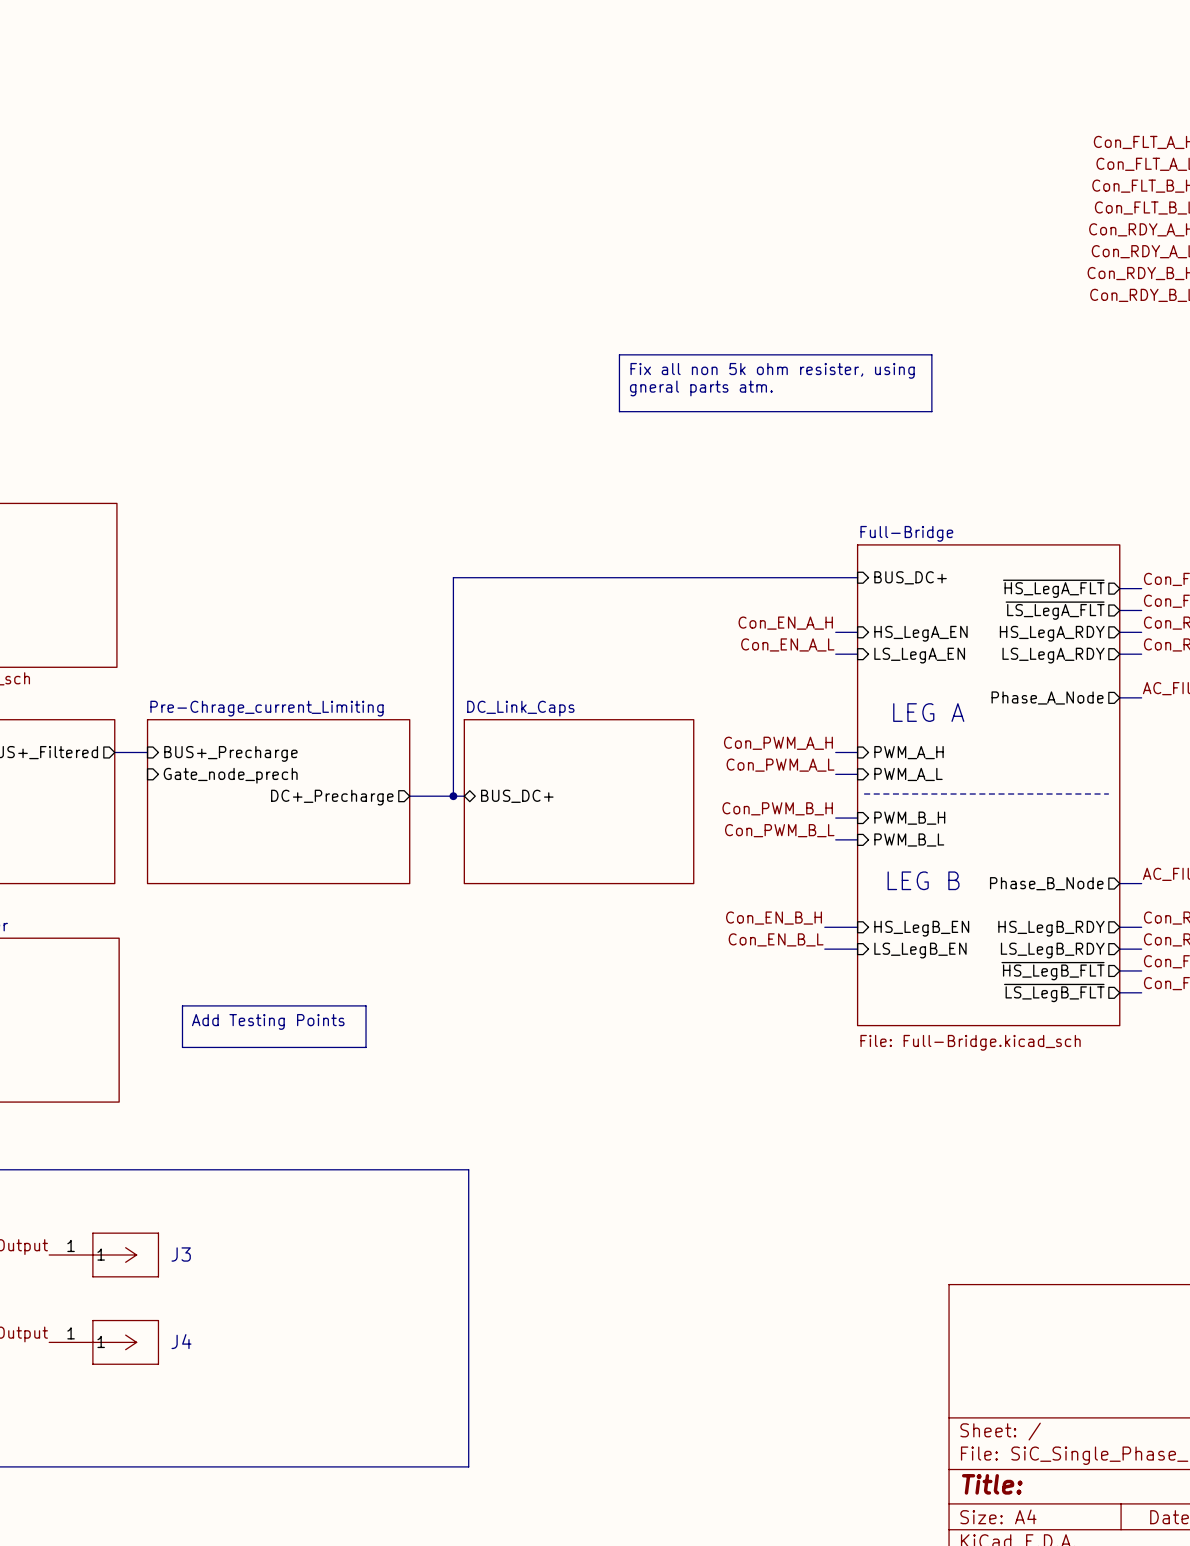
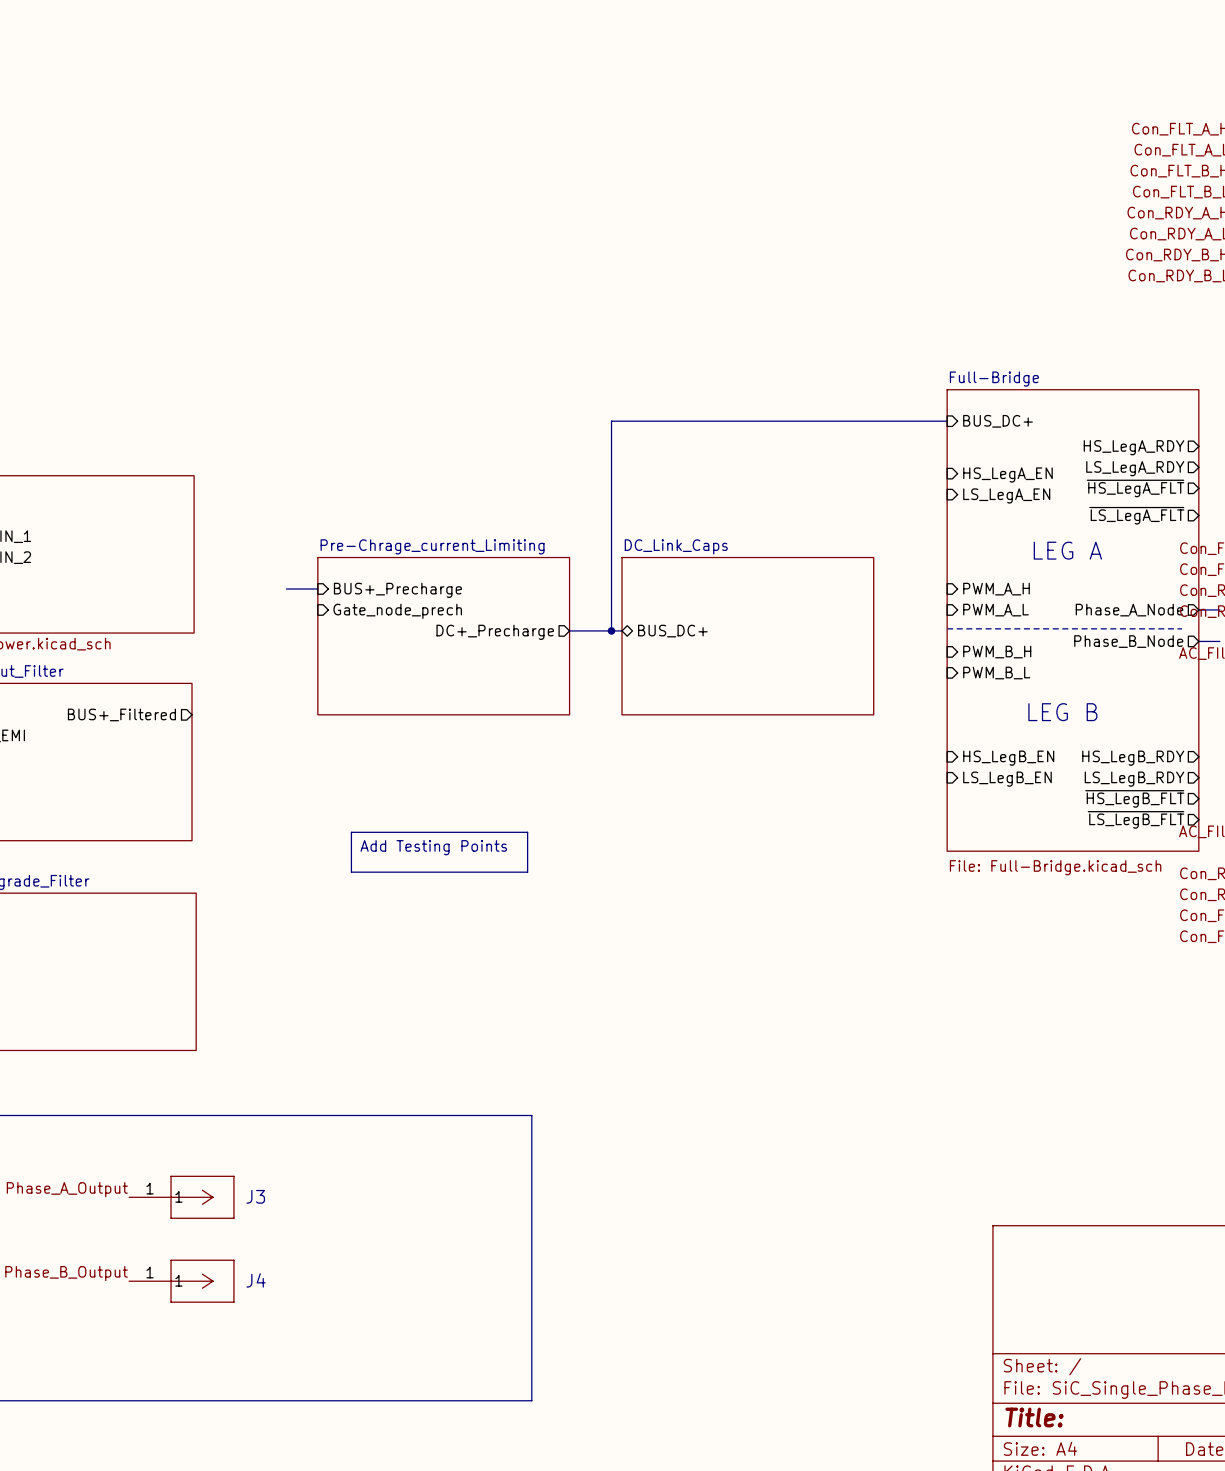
line: (619, 354) (931, 354) (931, 411) (619, 411) (619, 354) -> none
text: Fix all non 5k ohm resister, using (772, 370) -> none
text: gneral parts atm. (701, 388) -> none
wire: none -> (947, 421) (611, 421) (611, 630)
wire: (857, 577) (453, 577) (453, 796) -> none
sheet pin position: BUS_DC+ (910, 577) -> BUS_DC+ (997, 421)
sheet pin position: ~{HS_LegA_FLT} (1053, 588) -> ~{HS_LegA_FLT} (1135, 488)
wire: (1119, 588) (1141, 588) -> none
sheet pin position: ~{LS_LegA_FLT} (1055, 610) -> ~{LS_LegA_FLT} (1136, 515)
wire: (1119, 610) (1141, 610) -> none
label: Con_EN_A_H (785, 623) -> none
wire: (835, 632) (857, 632) -> none
wire: (1119, 632) (1141, 632) -> (1198, 609) (1219, 609)
sheet pin position: HS_LegA_EN (920, 633) -> HS_LegA_EN (1007, 474)
sheet pin position: HS_LegA_RDY (1052, 633) -> HS_LegA_RDY (1134, 447)
label: Con_EN_A_L (787, 644) -> none
wire: (835, 654) (857, 654) -> none
wire: (1119, 654) (1141, 654) -> (1198, 641) (1219, 641)
sheet pin position: LS_LegA_EN (919, 655) -> LS_LegA_EN (1006, 495)
sheet pin position: LS_LegA_RDY (1053, 655) -> LS_LegA_RDY (1135, 468)
junction: none -> (611, 630)
sheet pin: none -> BUS_DC+ (672, 631)
sheet DC_Link_Caps: none -> (747, 636)
sheet pin position: Phase_A_Node (1047, 697) -> Phase_A_Node (1129, 610)
wire: (1119, 697) (1141, 697) -> none
text position: LEG A (928, 712) -> LEG A (1067, 550)
label: Con_PWM_A_H (778, 743) -> none
wire: (114, 752) (147, 752) -> (286, 588) (317, 588)
wire: (835, 752) (857, 752) -> none
sheet pin position: PWM_A_H (909, 752) -> PWM_A_H (996, 589)
sheet pin position: BUS+_Precharge (230, 753) -> BUS+_Precharge (397, 590)
label: Con_PWM_A_L (780, 765) -> none
wire: (835, 774) (857, 774) -> none
sheet pin position: PWM_A_L (908, 774) -> PWM_A_L (995, 610)
sheet pin position: Gate_node_prech (230, 775) -> Gate_node_prech (397, 611)
sheet Full-Bridge position: (988, 785) -> (1072, 620)
line: (864, 794) (1108, 794) -> (947, 628) (1182, 628)
wire: (409, 796) (464, 796) -> (569, 630) (622, 630)
junction: (453, 796) -> none
sheet pin: BUS_DC+ (517, 796) -> none
sheet pin position: DC+_Precharge (332, 797) -> DC+_Precharge (495, 632)
sheet Pre-Chrage_current_Limiting position: (278, 801) -> (443, 636)
sheet DC_Link_Caps: (579, 801) -> none
label: Con_PWM_B_H (777, 808) -> none
wire: (835, 818) (857, 818) -> none
sheet pin position: PWM_B_H (909, 818) -> PWM_B_H (997, 652)
label: Con_PWM_B_L (779, 830) -> none
wire: (835, 839) (857, 839) -> none
sheet pin position: PWM_B_L (909, 839) -> PWM_B_L (996, 673)
text position: LEG B (923, 880) -> LEG B (1062, 712)
sheet pin position: Phase_B_Node (1046, 883) -> Phase_B_Node (1128, 641)
wire: (1119, 883) (1141, 883) -> none
label: Con_EN_B_H (774, 918) -> none
wire: (824, 927) (857, 927) -> none
wire: (1119, 927) (1141, 927) -> none
sheet pin position: HS_LegB_EN (921, 928) -> HS_LegB_EN (1008, 758)
sheet pin position: HS_LegB_RDY (1051, 928) -> HS_LegB_RDY (1133, 758)
label: Con_EN_B_L (776, 939) -> none
wire: (824, 949) (857, 949) -> none
wire: (1119, 949) (1141, 949) -> none
sheet pin position: LS_LegB_EN (920, 950) -> LS_LegB_EN (1007, 779)
sheet pin position: LS_LegB_RDY (1052, 950) -> LS_LegB_RDY (1134, 779)
wire: (1119, 970) (1141, 970) -> none
sheet pin position: ~{HS_LegB_FLT} (1053, 971) -> ~{HS_LegB_FLT} (1134, 798)
sheet pin position: ~{LS_LegB_FLT} (1054, 992) -> ~{LS_LegB_FLT} (1136, 819)
wire: (1119, 992) (1141, 992) -> none
line: (182, 1005) (366, 1005) (366, 1047) (182, 1047) (182, 1005) -> (351, 832) (527, 832) (527, 872) (351, 872) (351, 832)
text position: Add Testing Points (268, 1021) -> Add Testing Points (433, 847)

